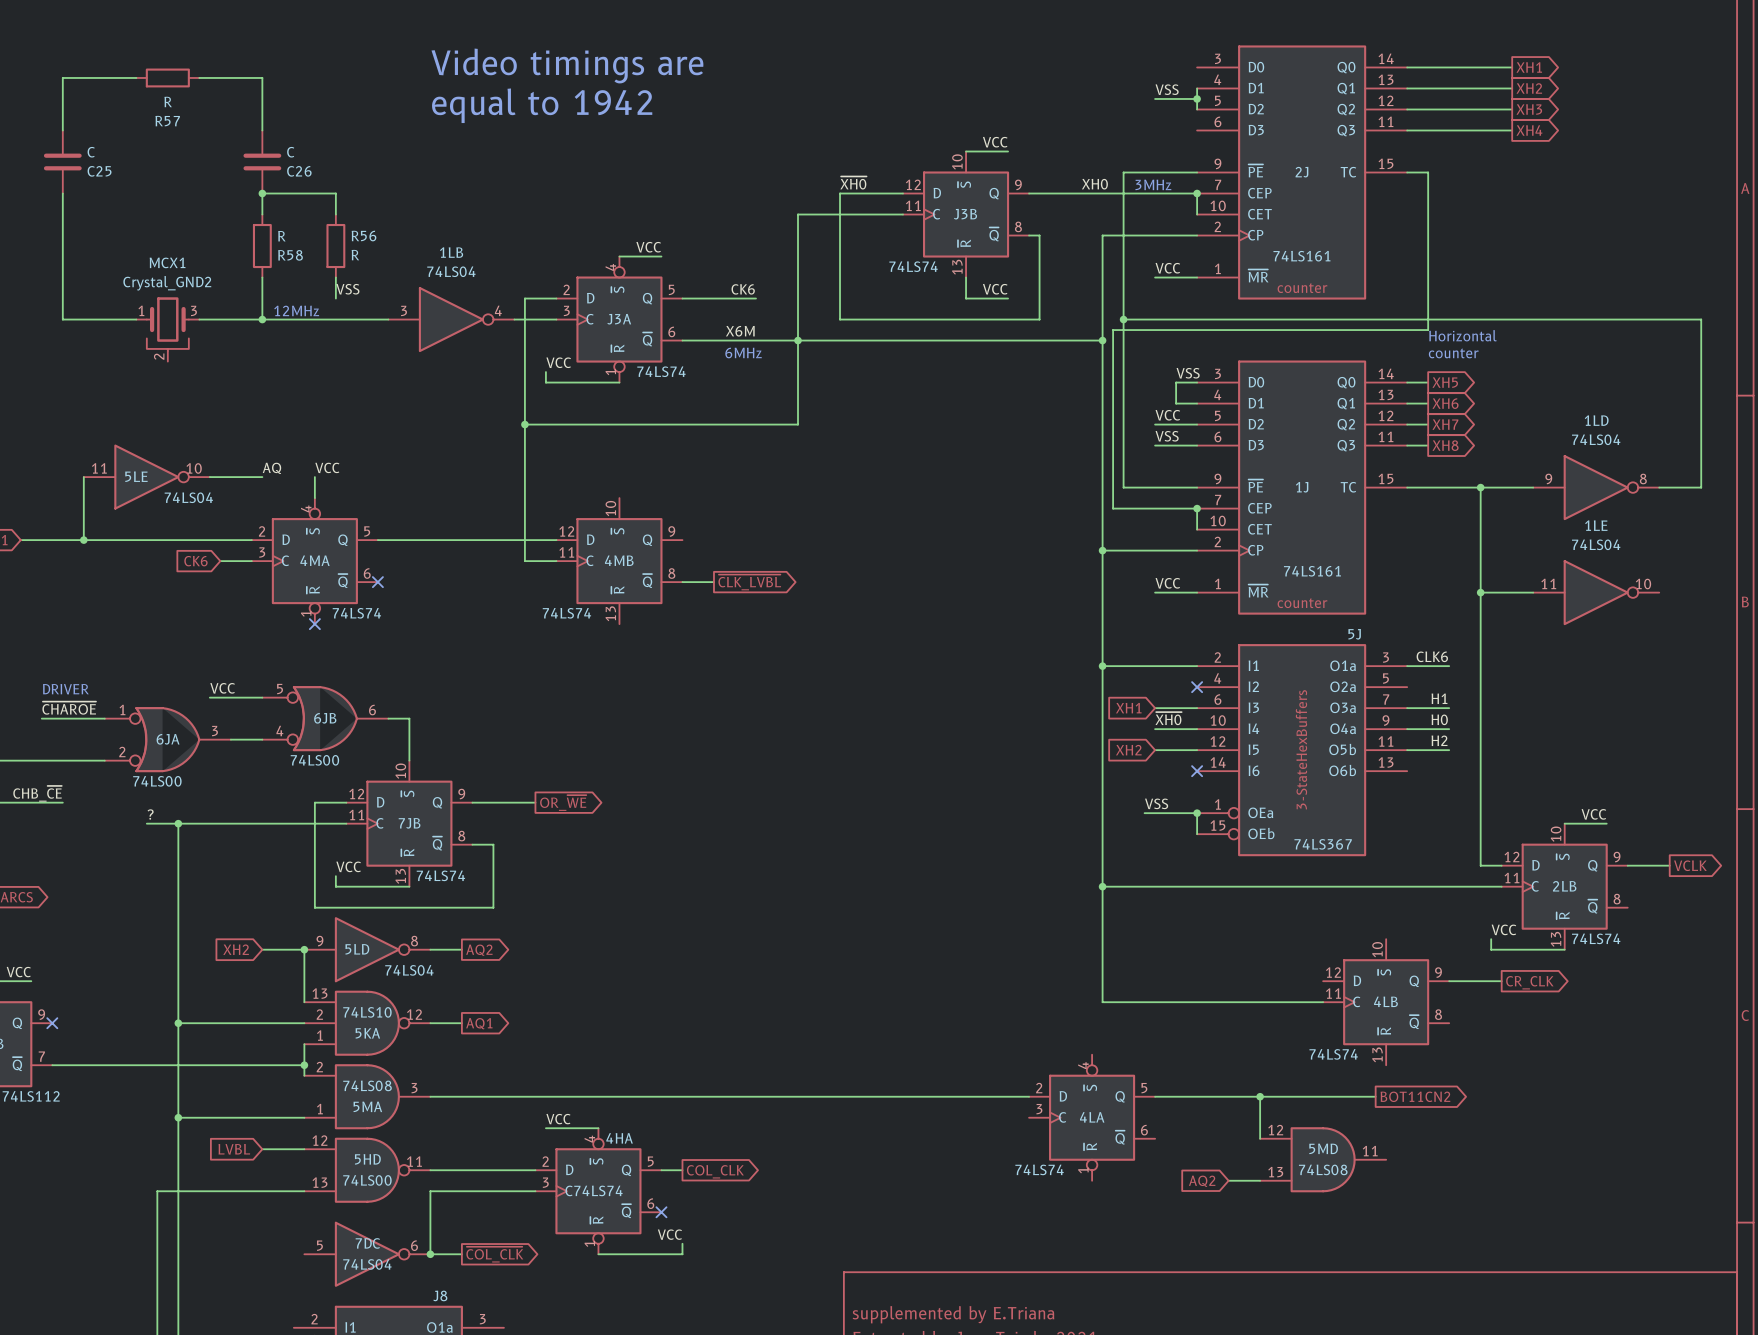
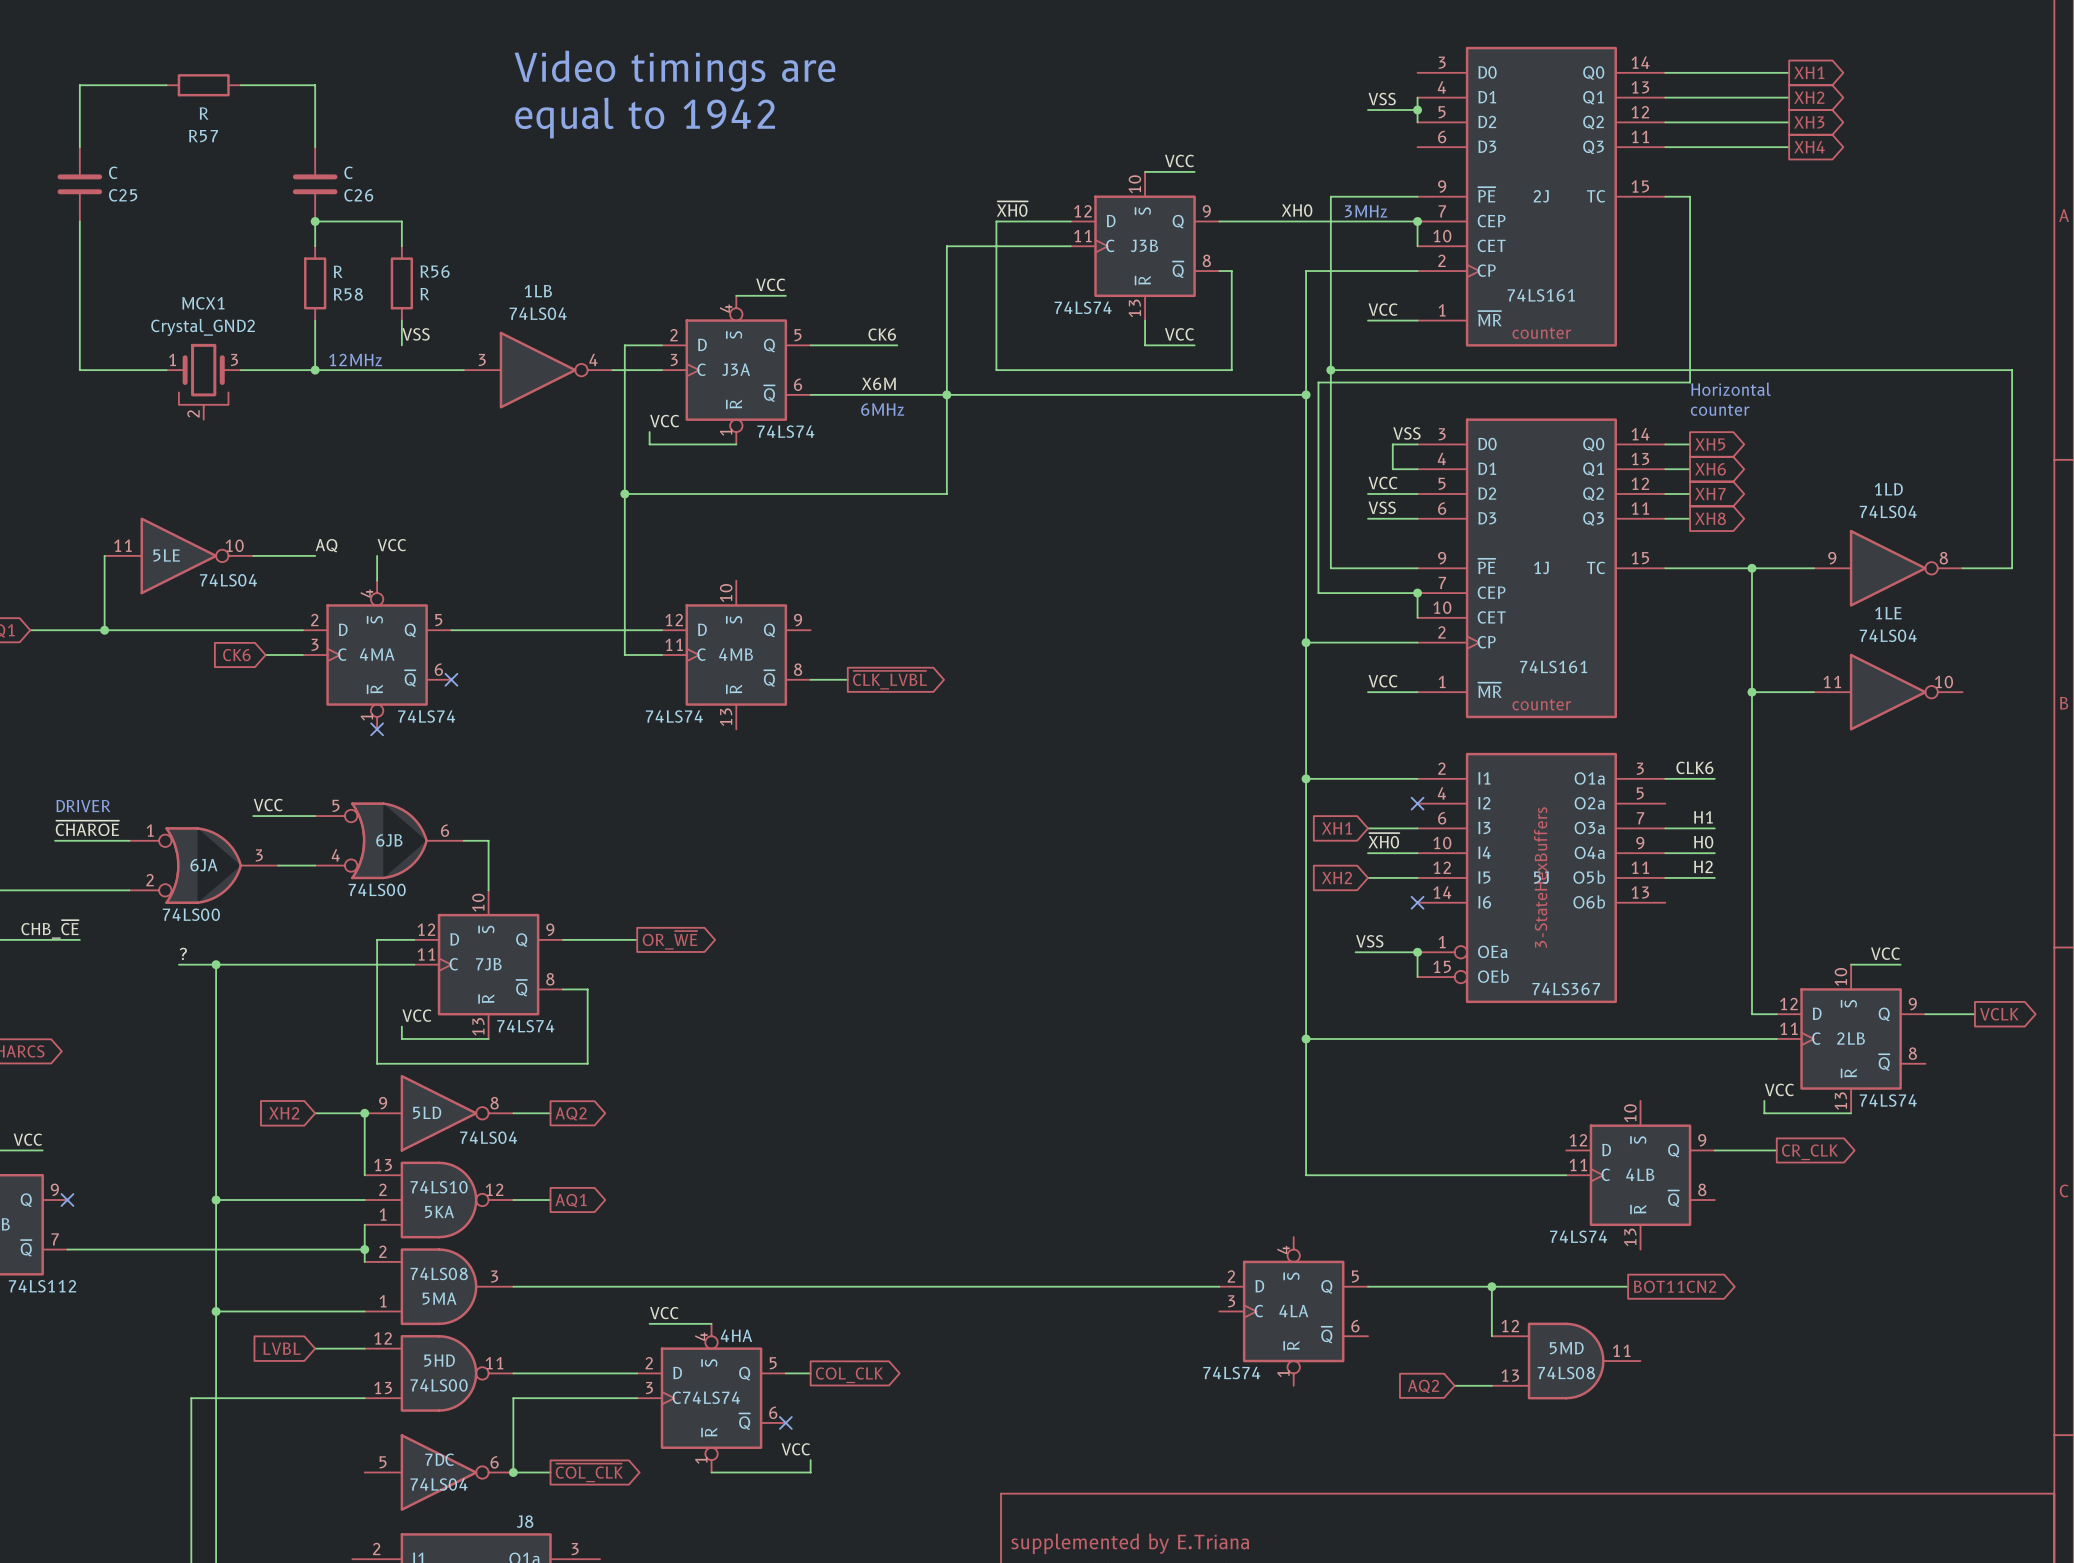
5J name position: 5J (1354, 634) -> 5J (1541, 877)

